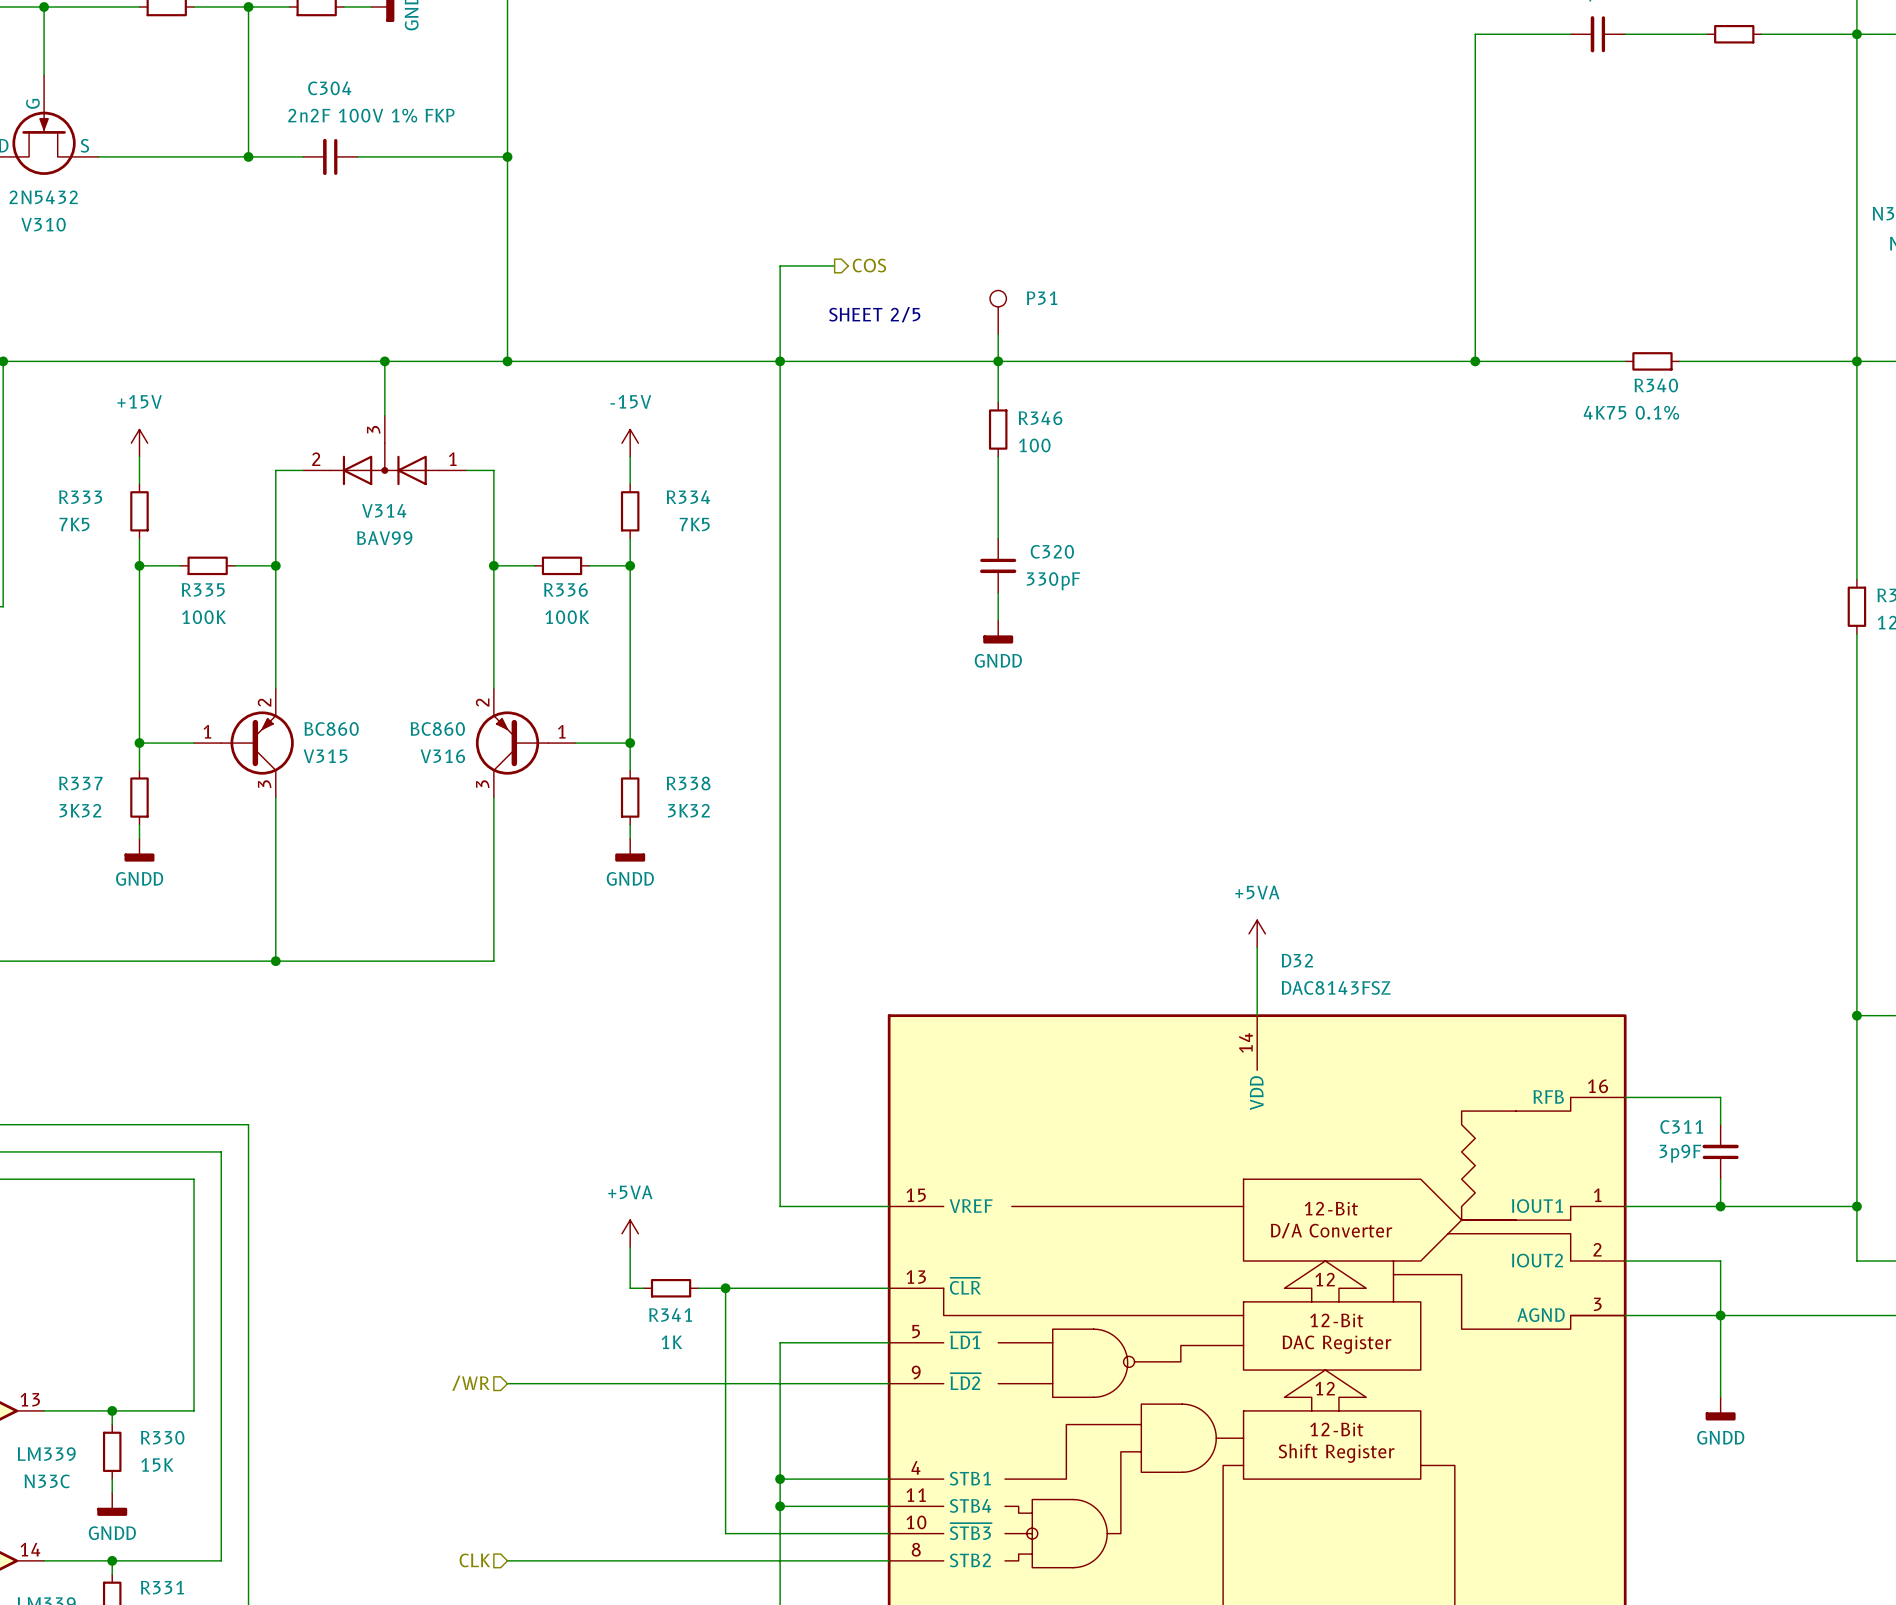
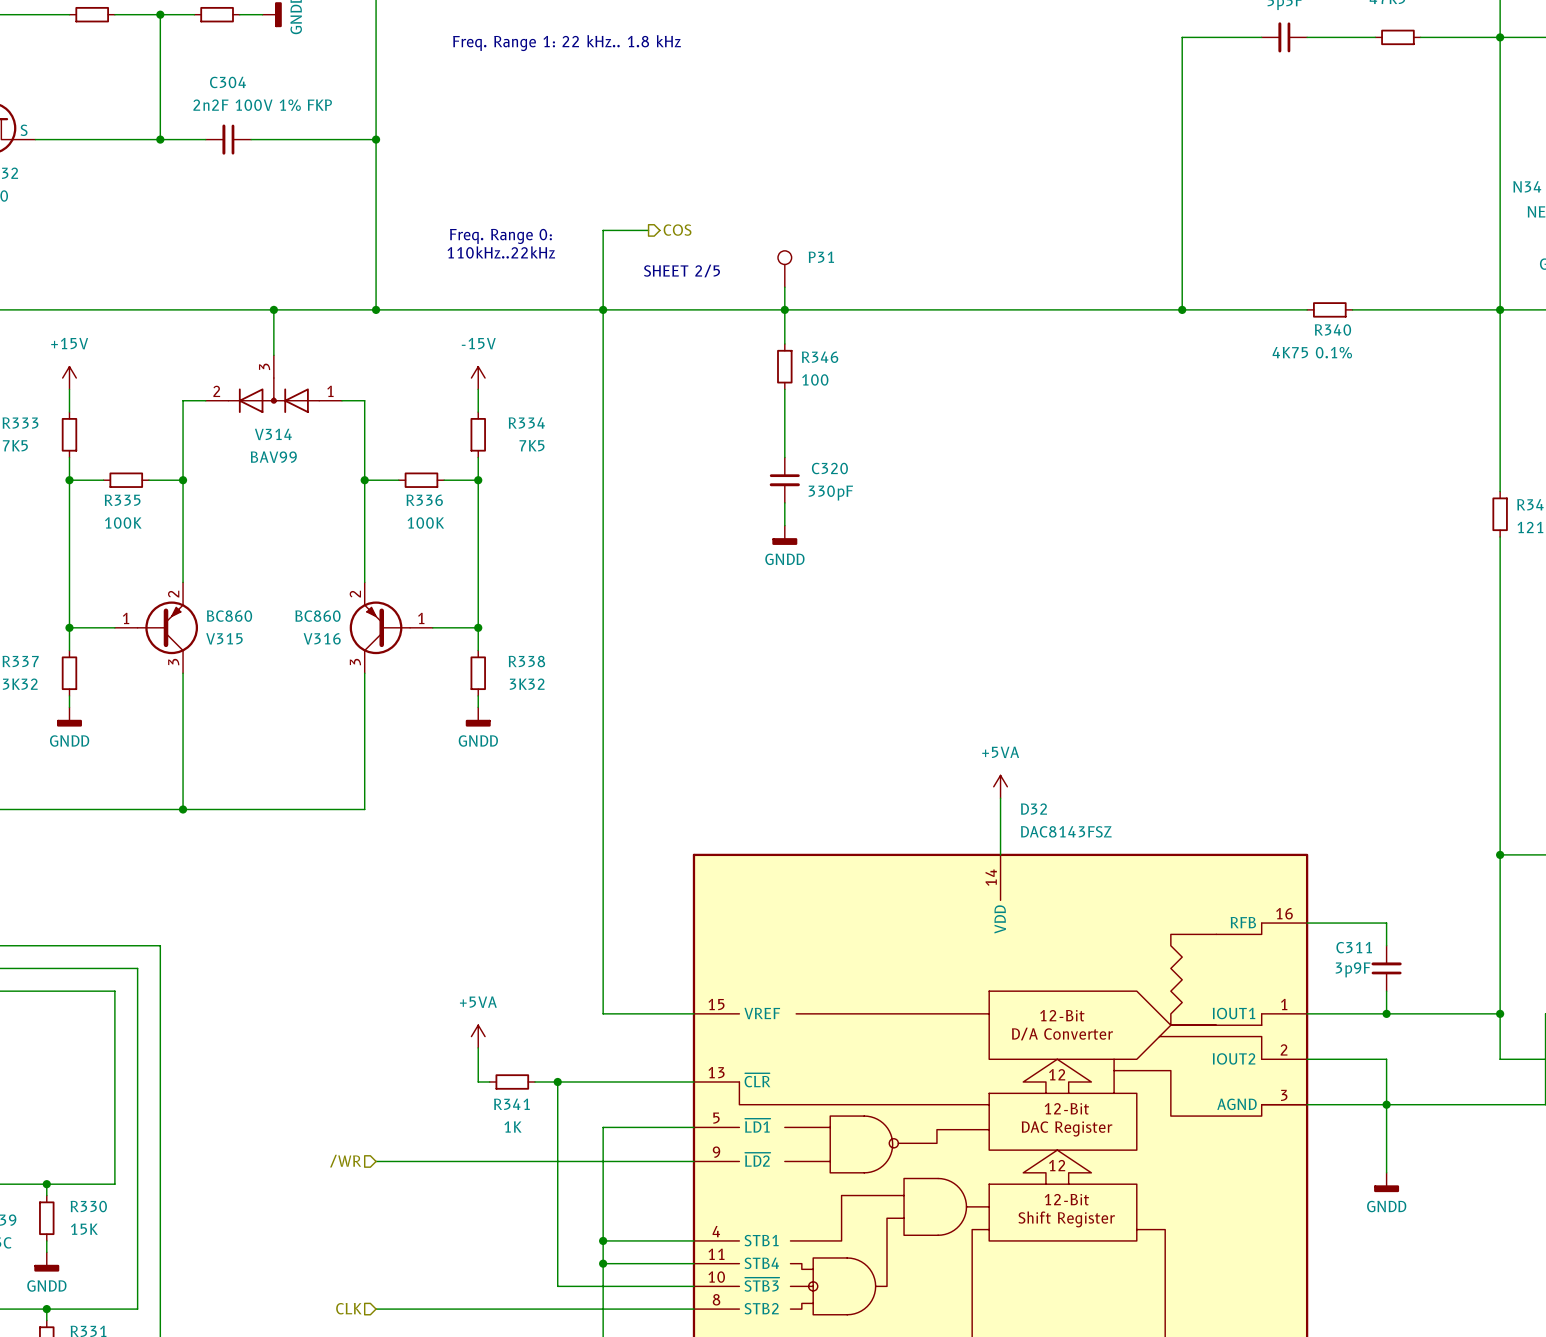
text: none -> Freq. Range 1: 22 kHz.. 1.8 kHz (567, 43)
text: none -> Freq. Range 0: (500, 236)
text: none -> 110kHz..22kHz (501, 252)

